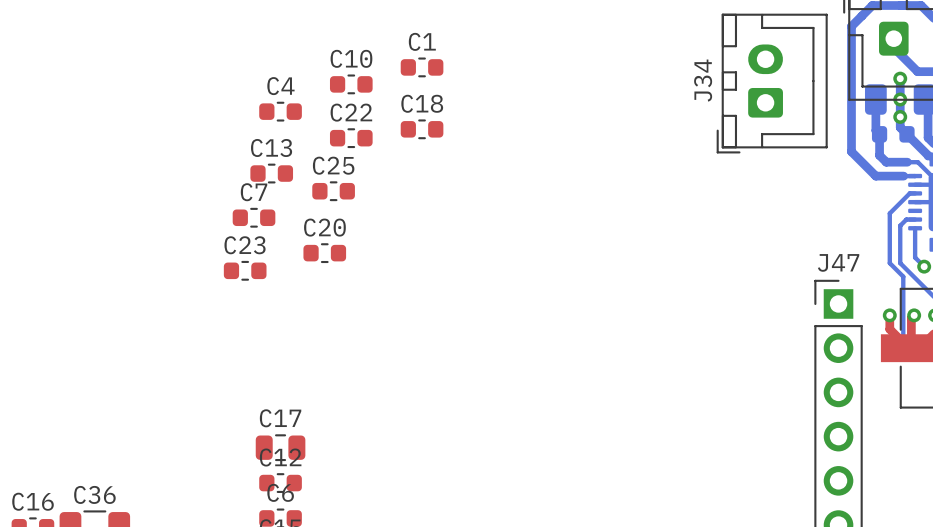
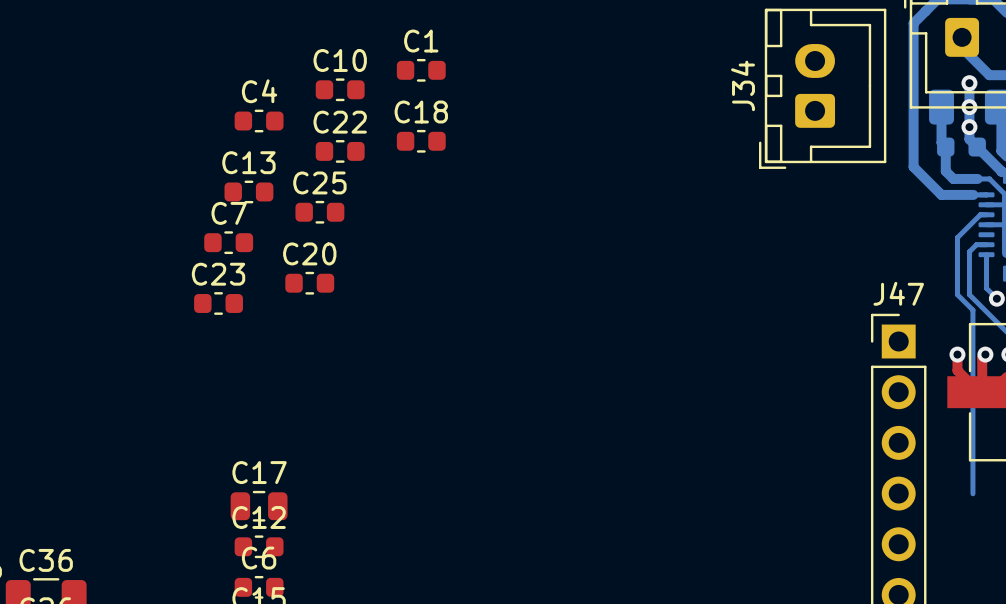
bottom track: none -> (972, 378) (972, 493)

